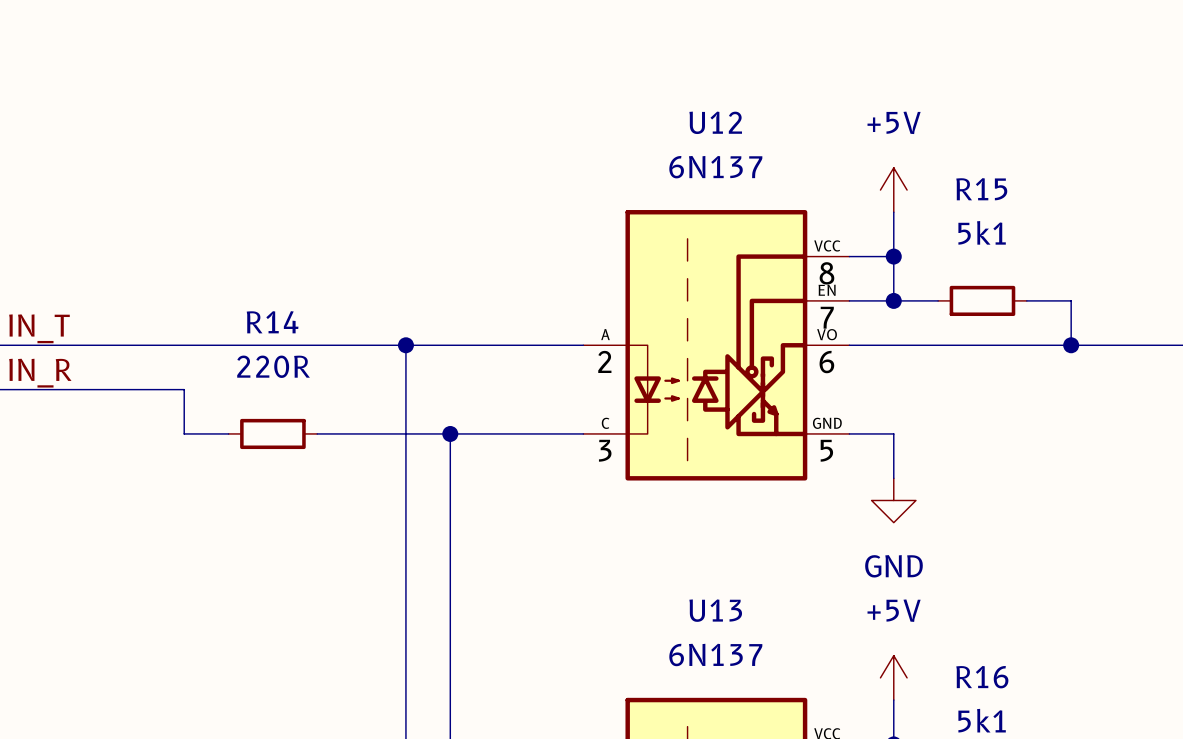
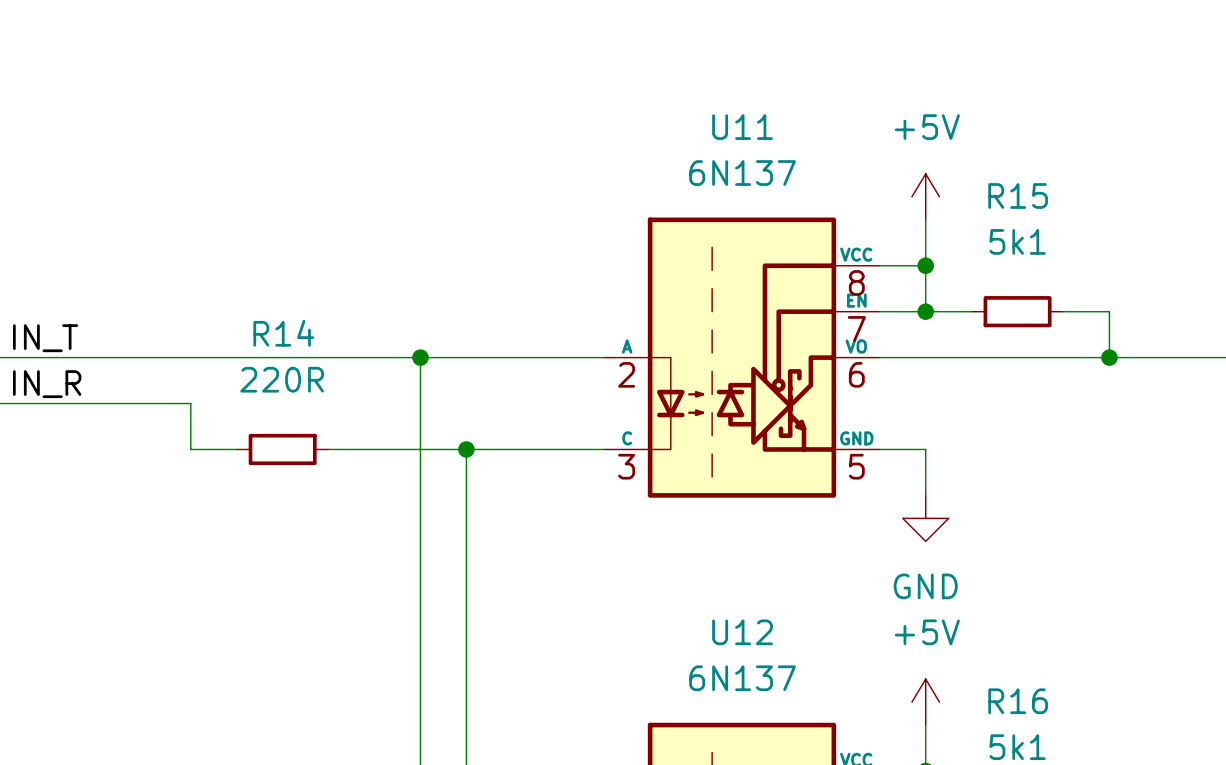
U12 name: U12 (715, 122) -> U11 (742, 127)
U13 name: U13 (715, 610) -> U12 (742, 632)

